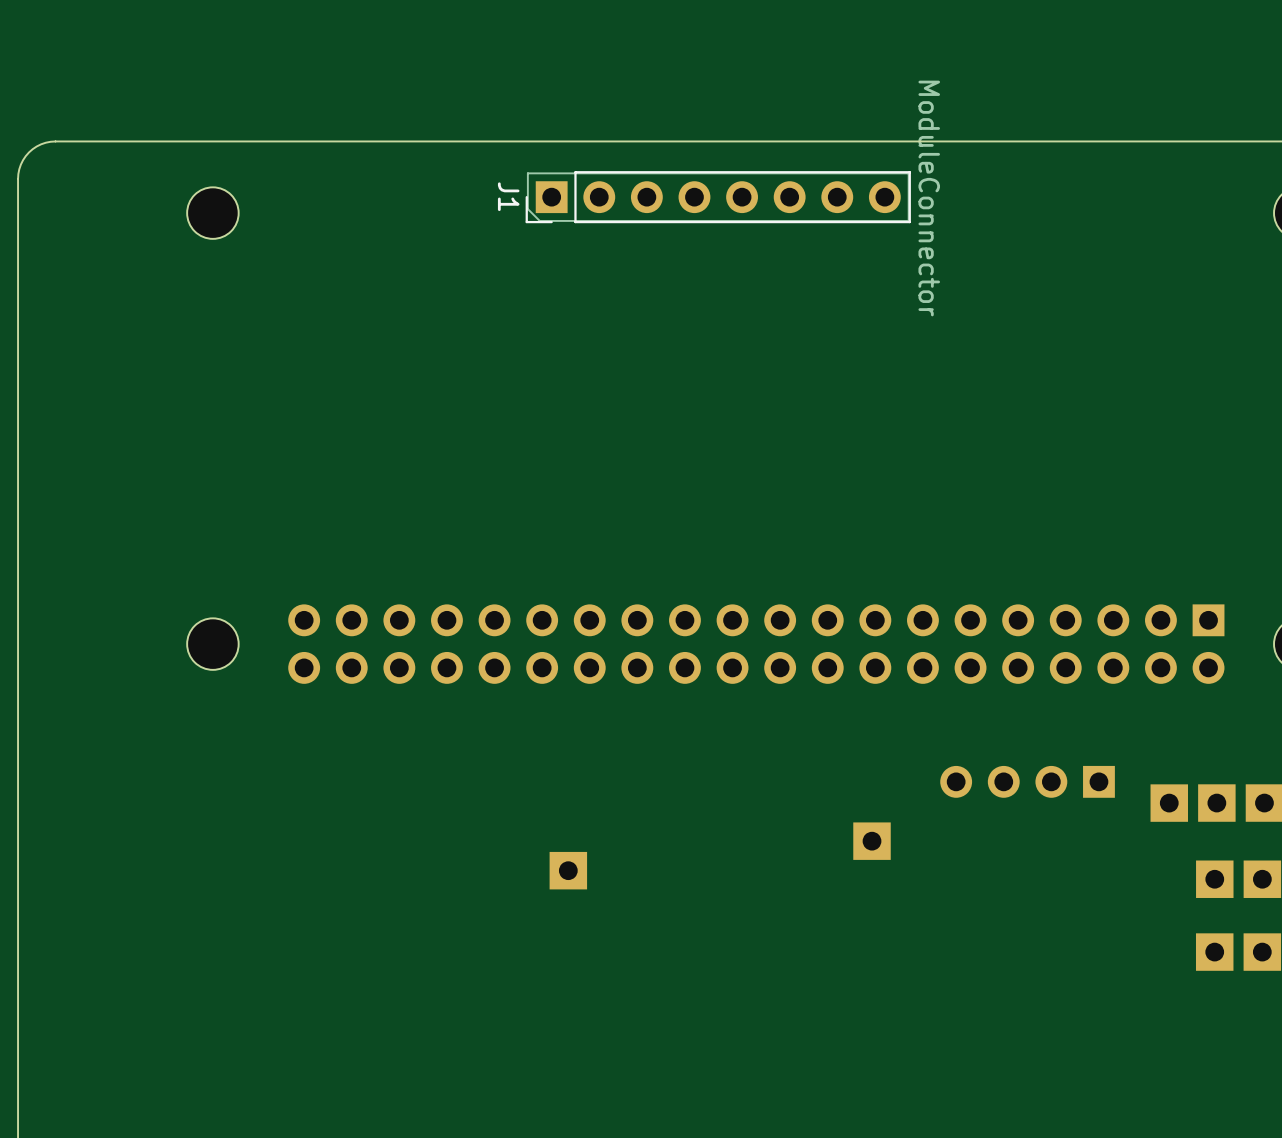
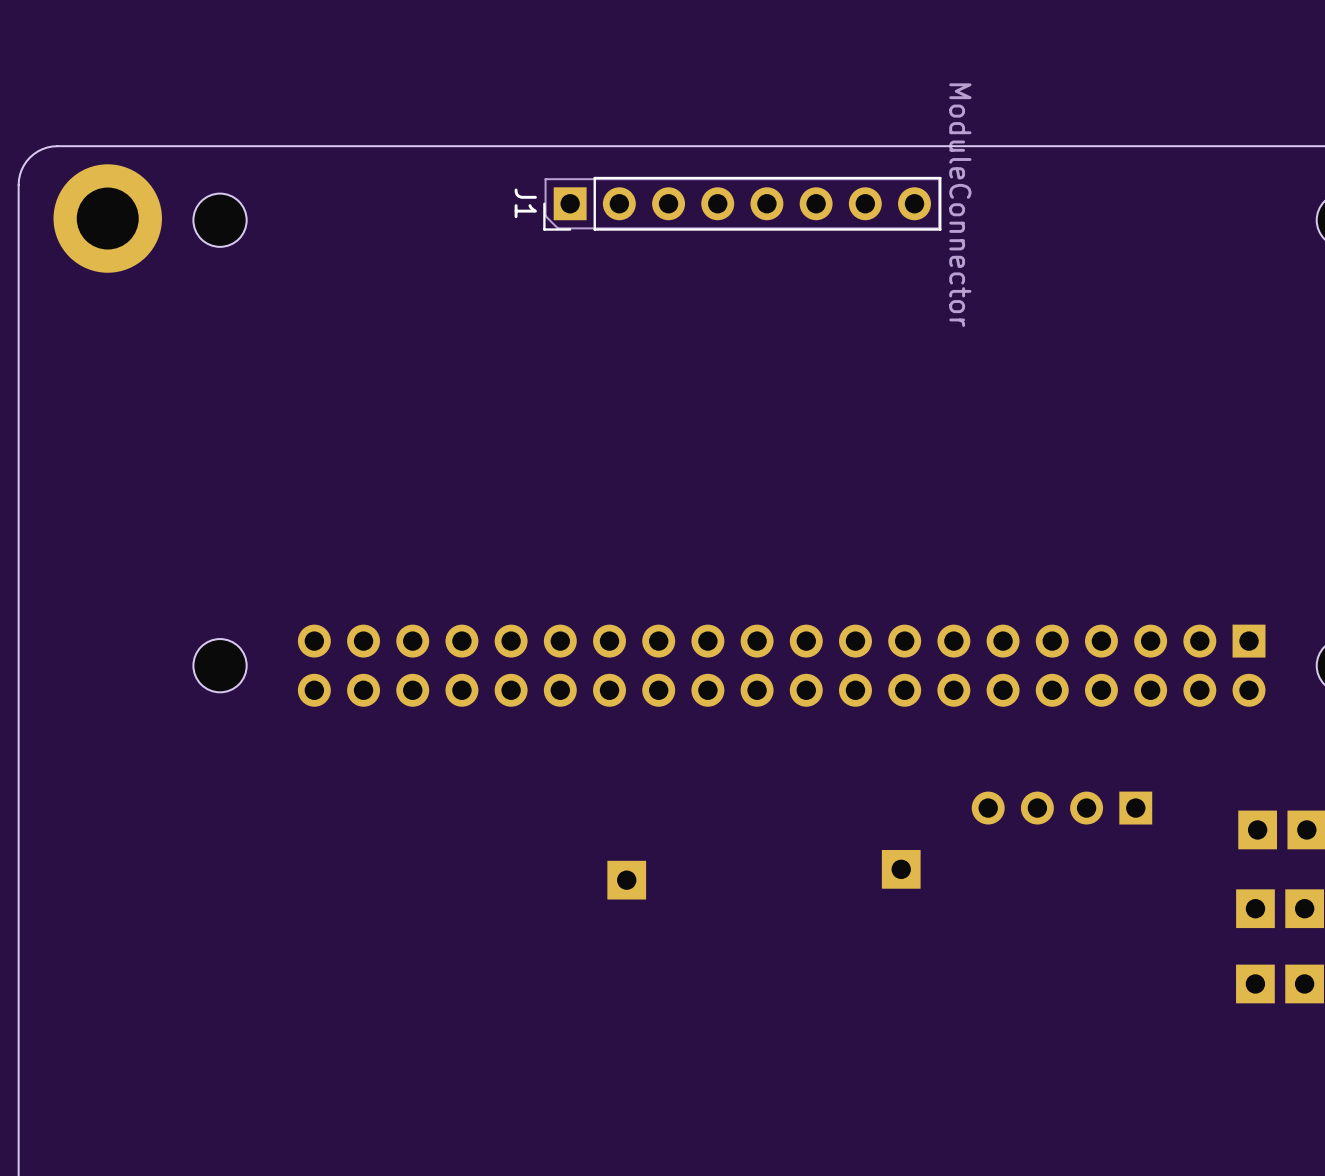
part: none -> (107, 218)
part: (1169, 803) -> none
part position: (568, 870) -> (626, 880)

